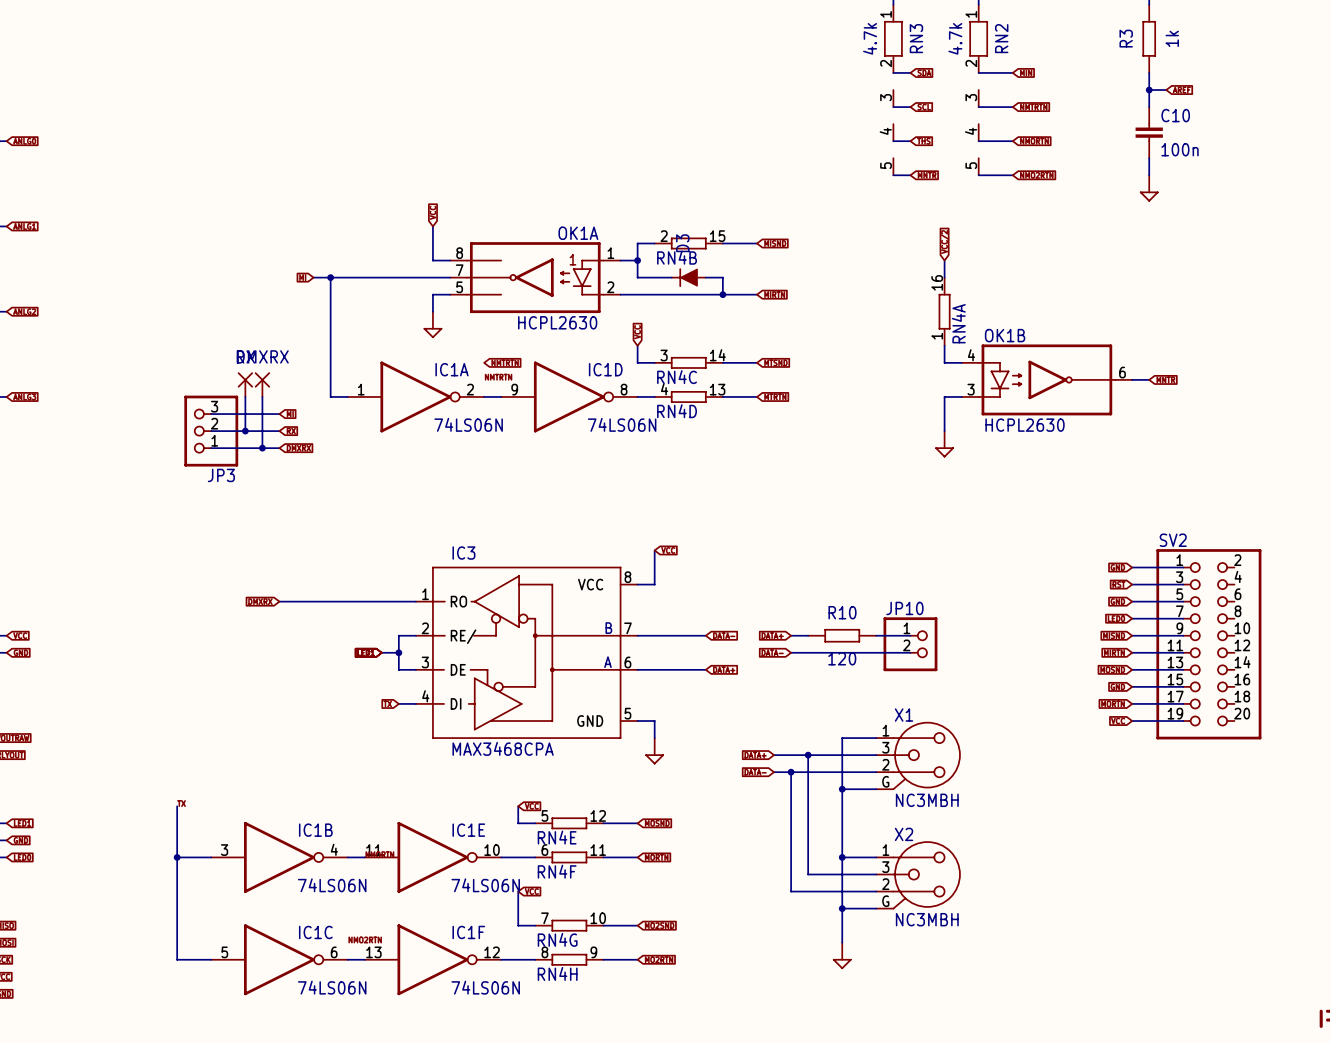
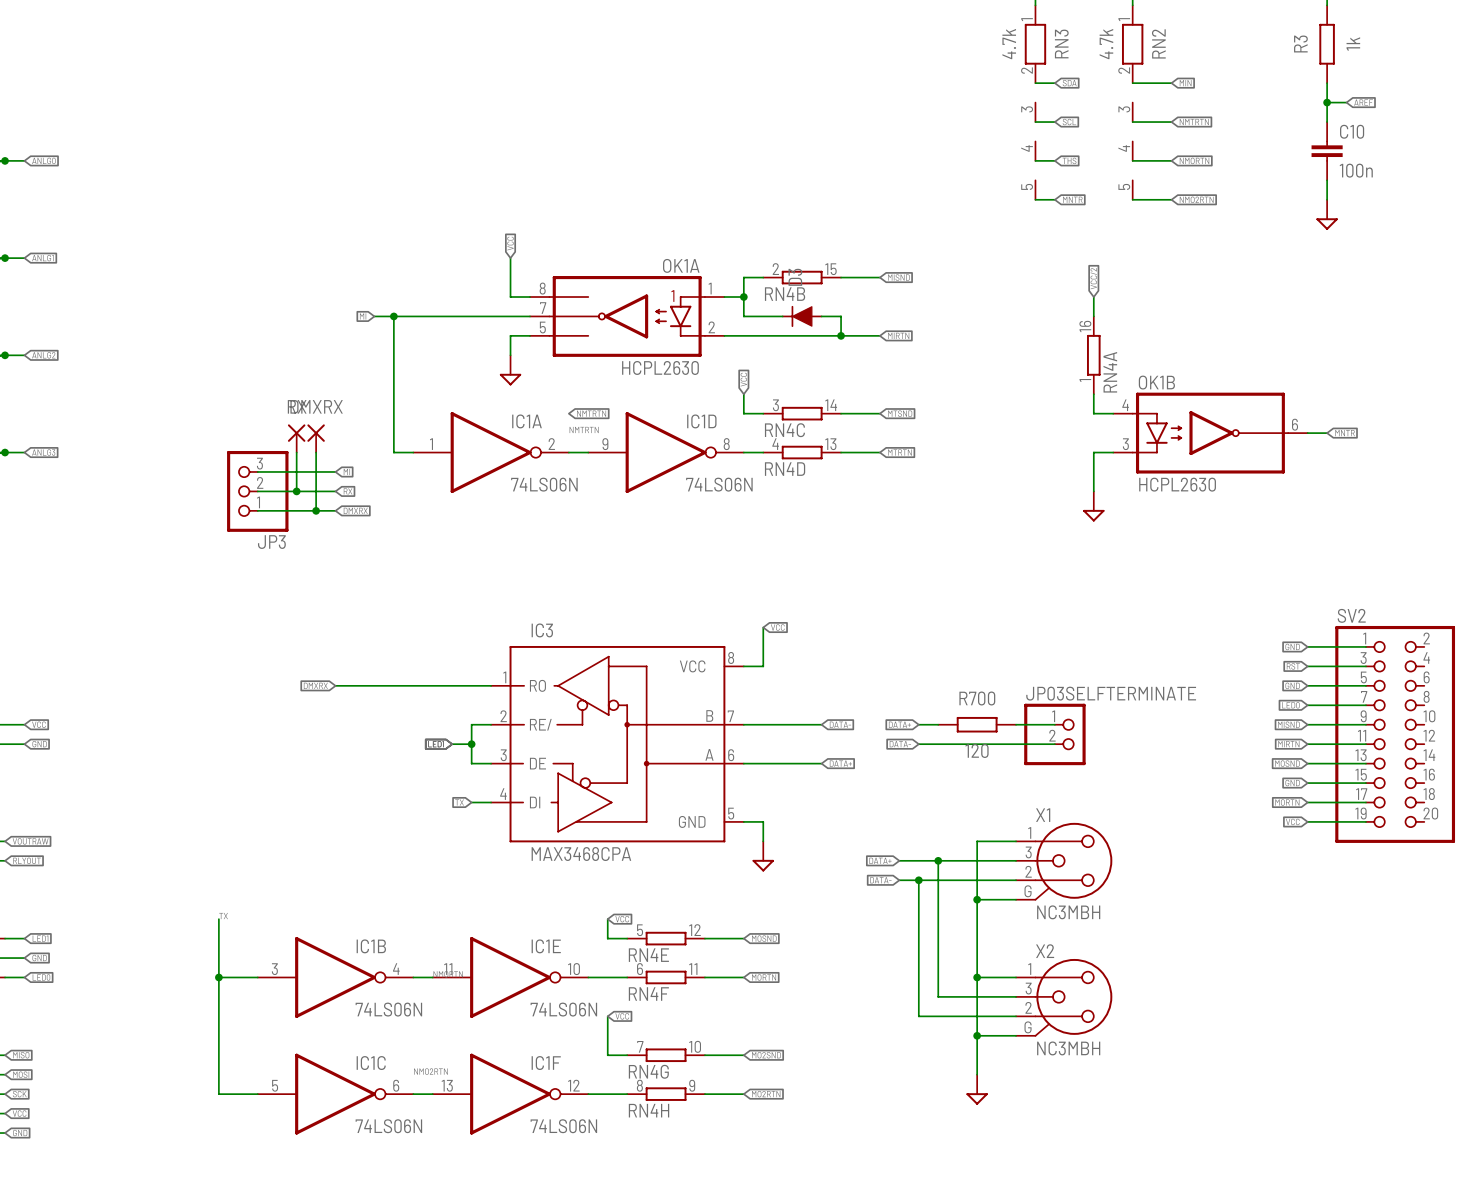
JP10 name: JP10 (904, 608) -> JP03SELFTERMINATE (1111, 693)
R10 name: R10 (842, 612) -> R700 (977, 698)

